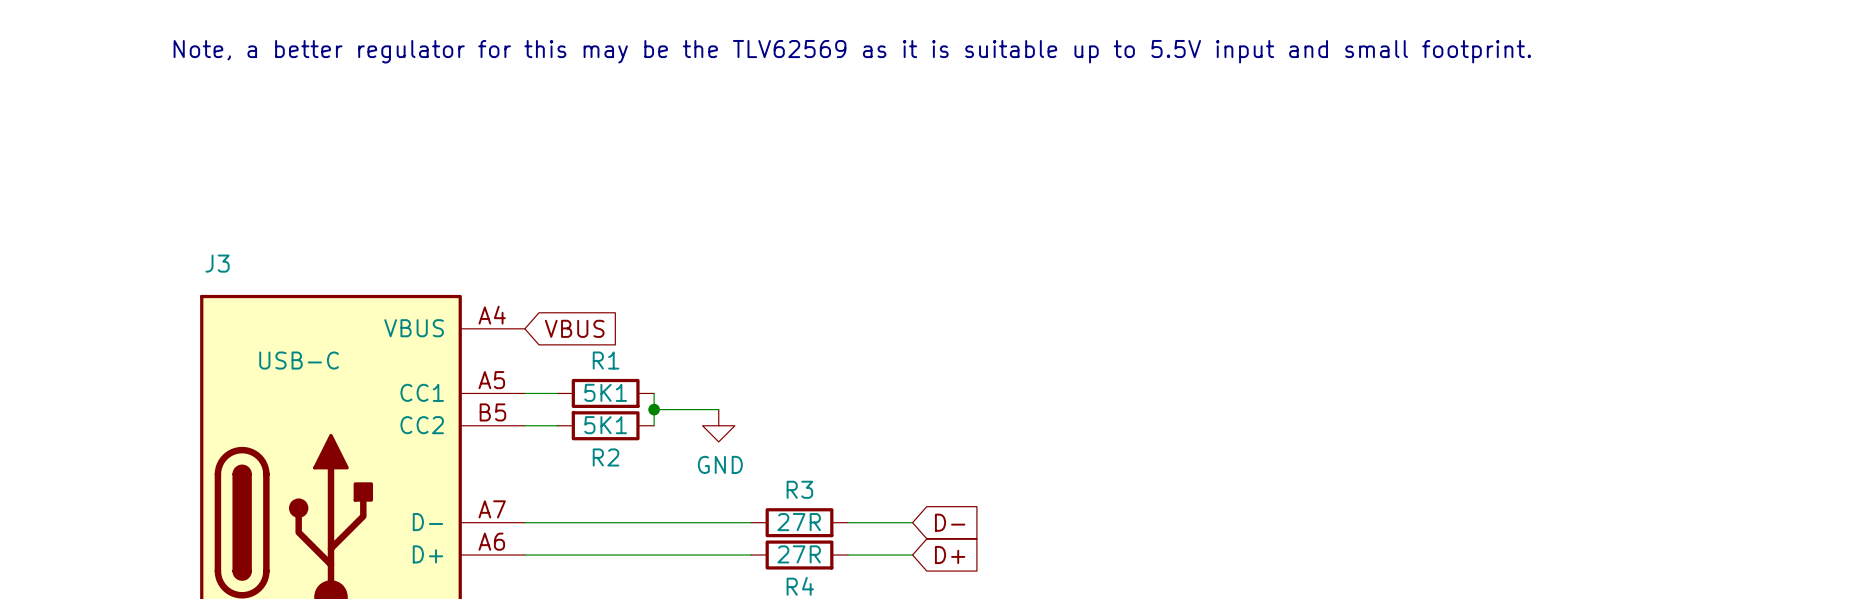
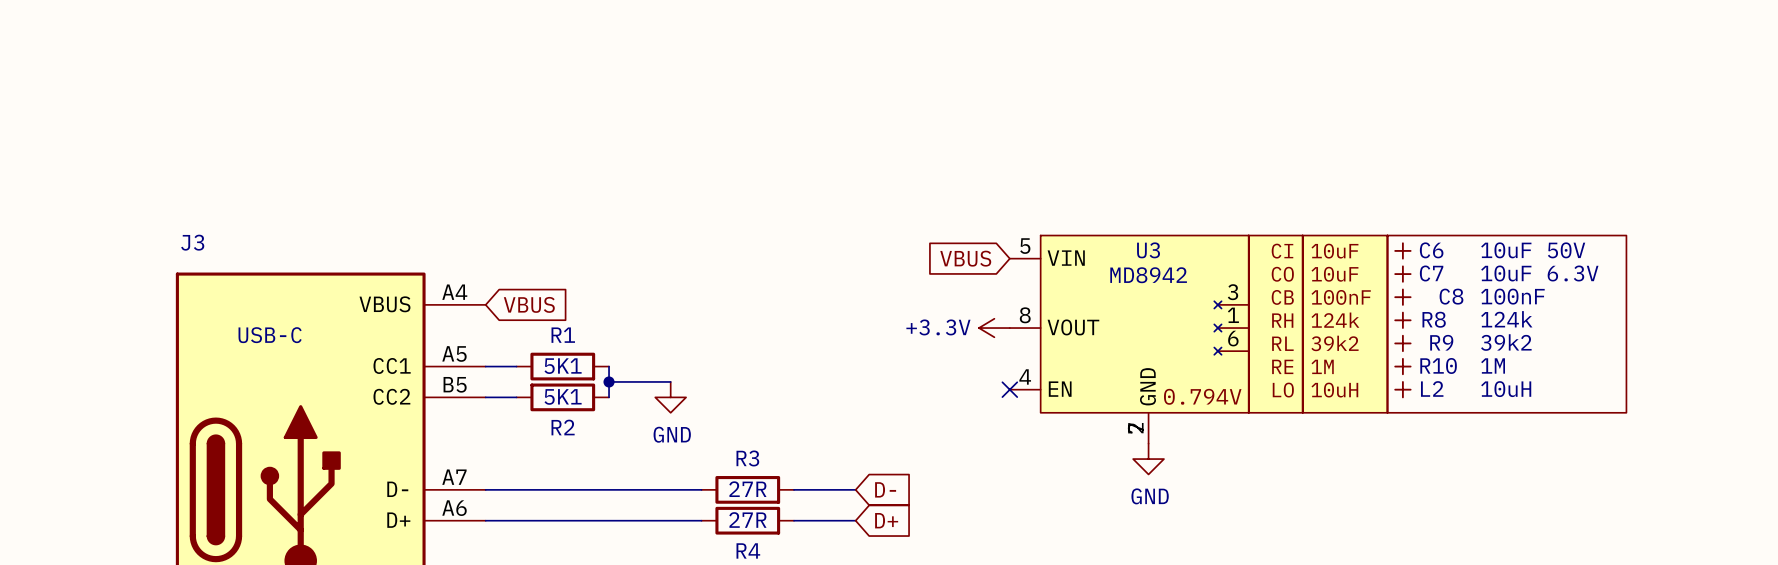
text: Note, a better regulator for this may be the TLV62569 as it is suitable up to 5.5V input and small footprint. (852, 51) -> none
C6: none -> 10uF 50V (1402, 250)
global label: none -> VBUS (965, 258)
C7: none -> 10uF 6.3V (1402, 274)
C8: none -> 100nF (1402, 297)
R8: none -> 124k (1402, 320)
power symbol: none -> +3.3V (994, 328)
U3: none -> MD8942 (1318, 339)
R9: none -> 39k2 (1402, 343)
R10: none -> 1M (1402, 366)
no-connect mark: none -> (1009, 389)
L2: none -> 10uH (1402, 389)
power symbol: none -> GND (1148, 459)

